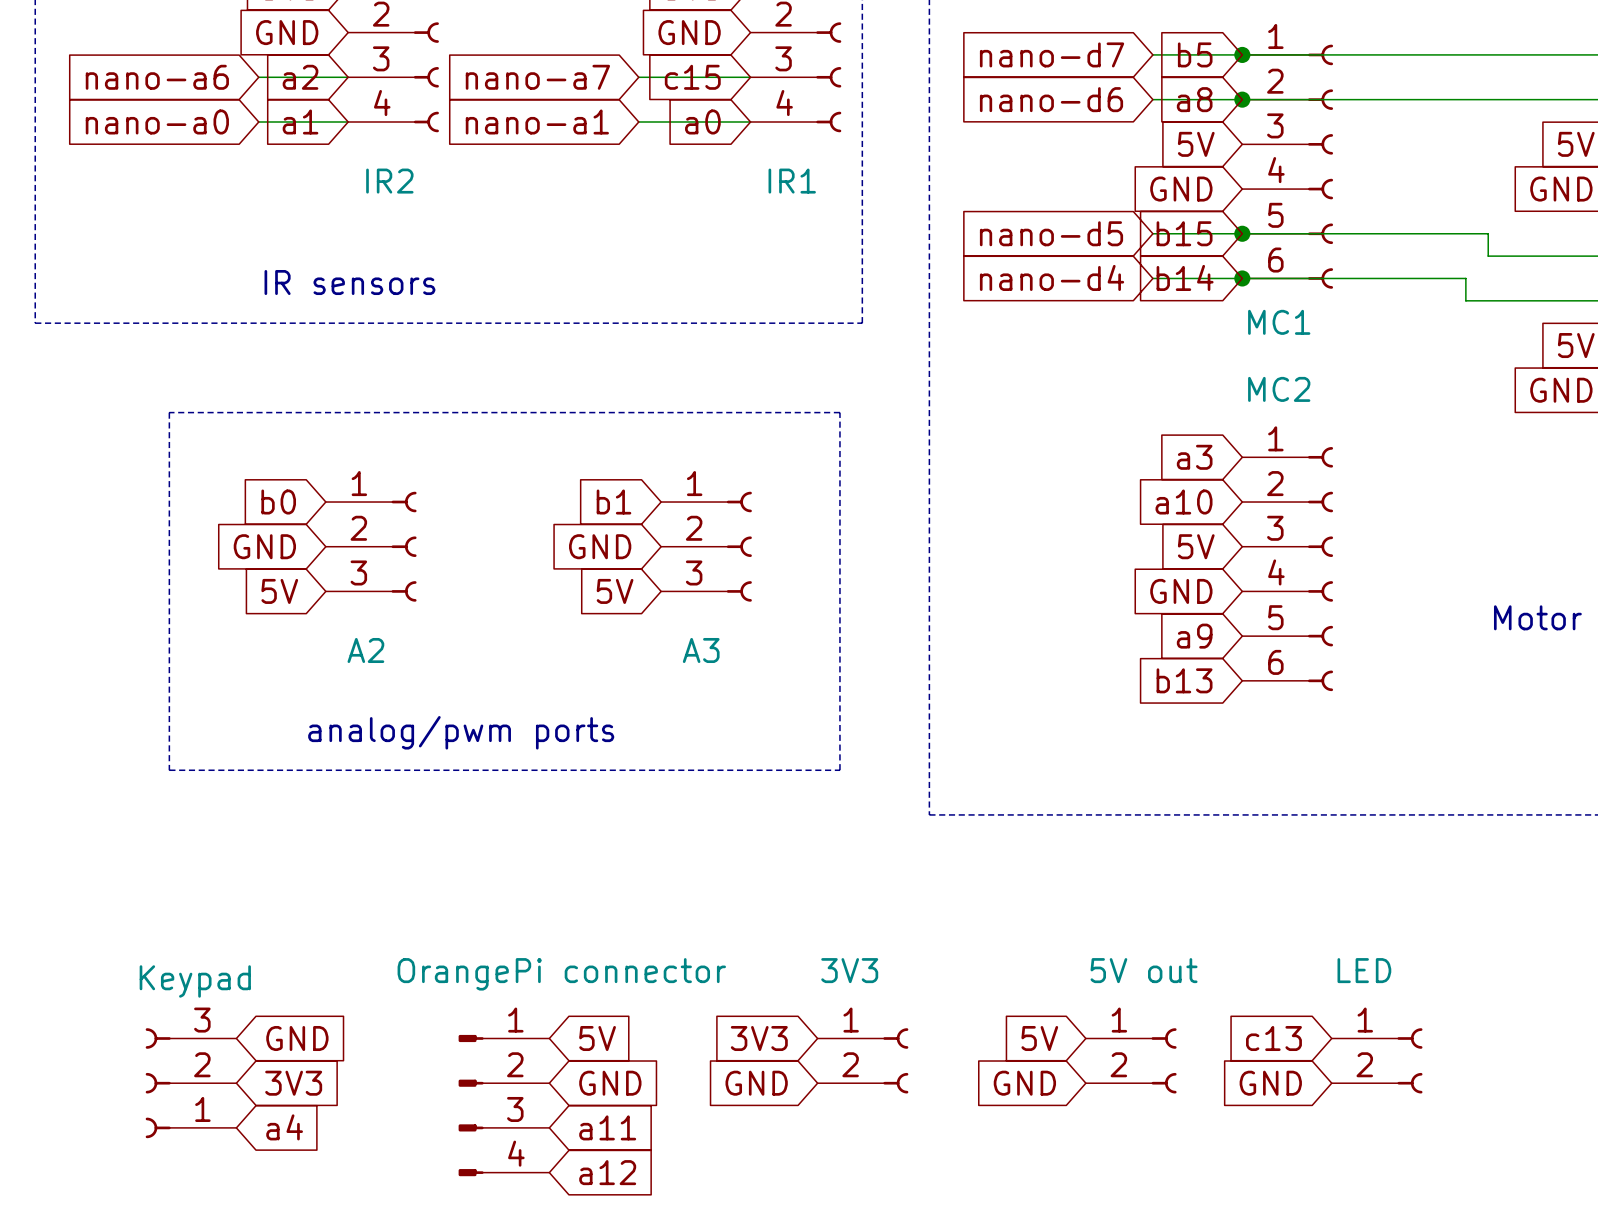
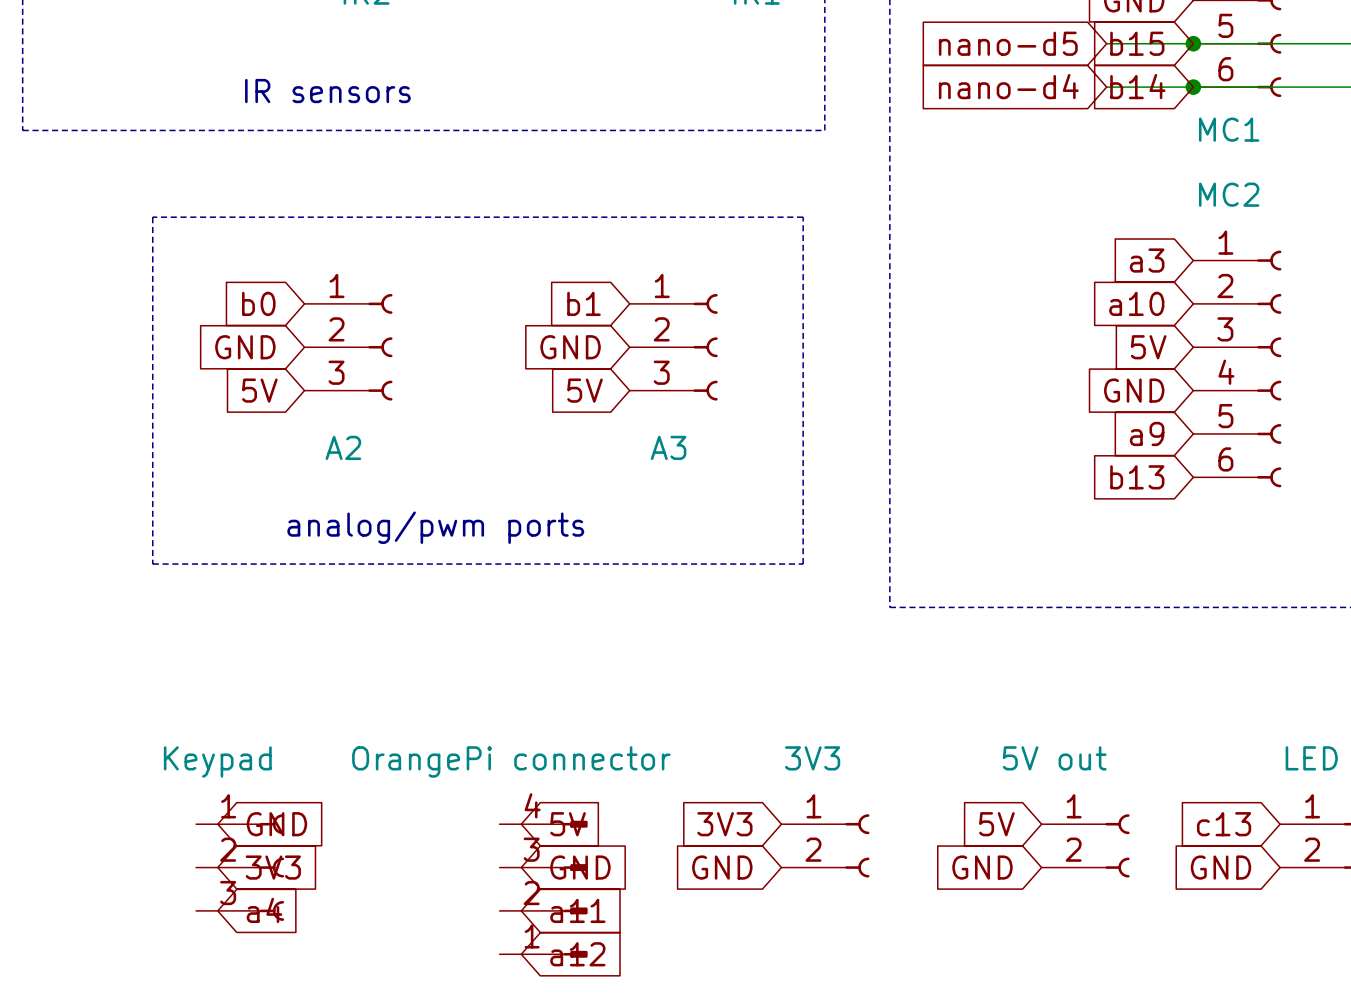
part value position: 5V out (1144, 970) -> 5V out (1054, 758)
part value position: OrangePi connector (561, 974) -> OrangePi connector (511, 761)
part rotation: 0° (158, 1083) -> 180° (271, 867)
part position: (191, 1083) -> (240, 867)
part rotation: 0° (471, 1105) -> 180° (575, 889)

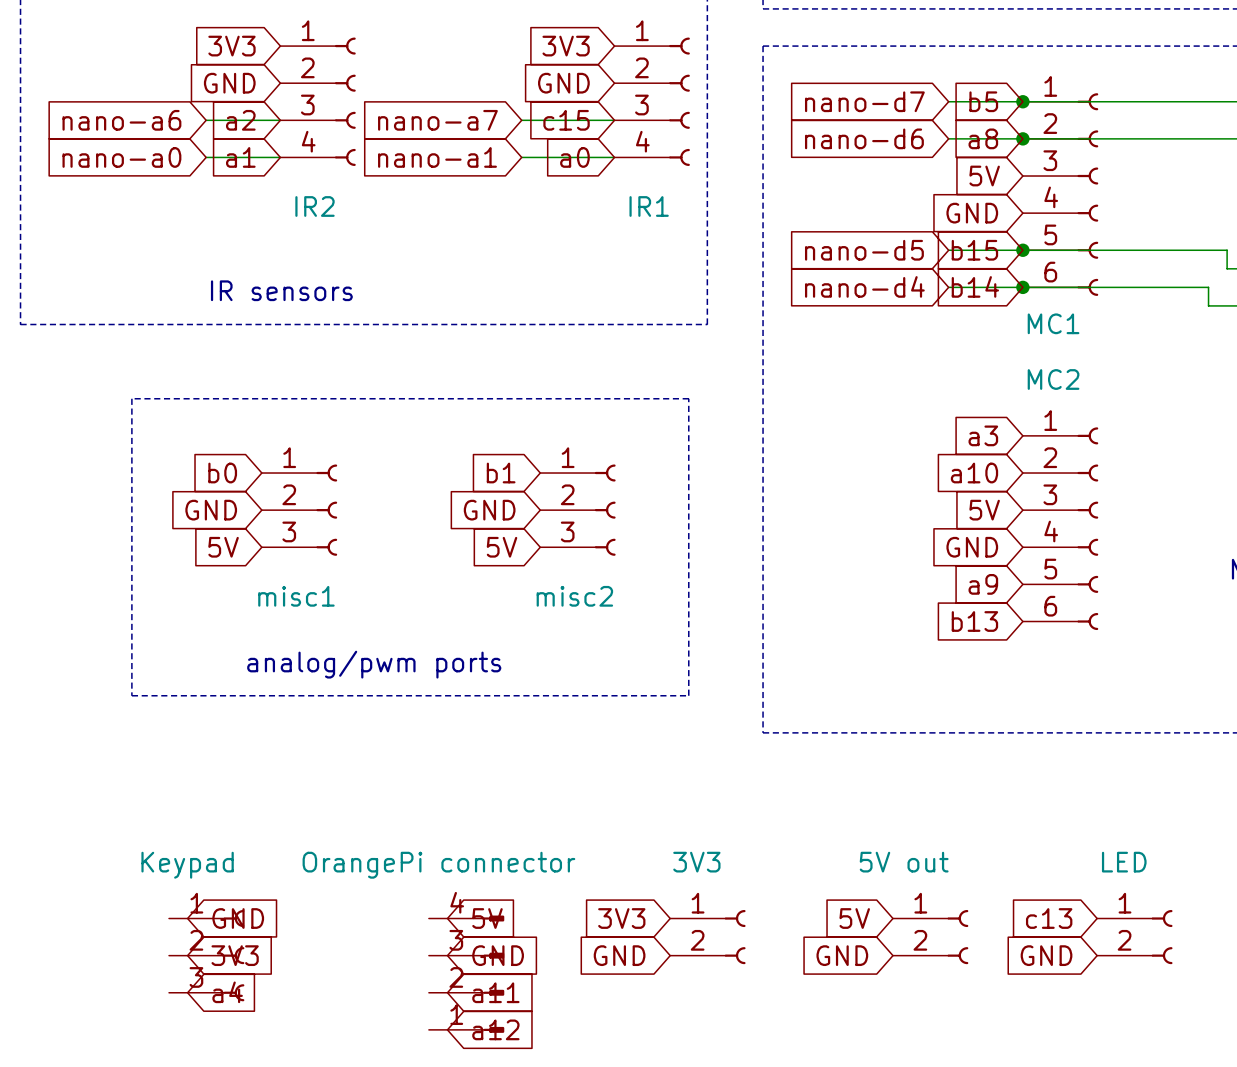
part value: A2 (343, 447) -> misc1 (296, 596)
part value: A3 (668, 447) -> misc2 (574, 596)

